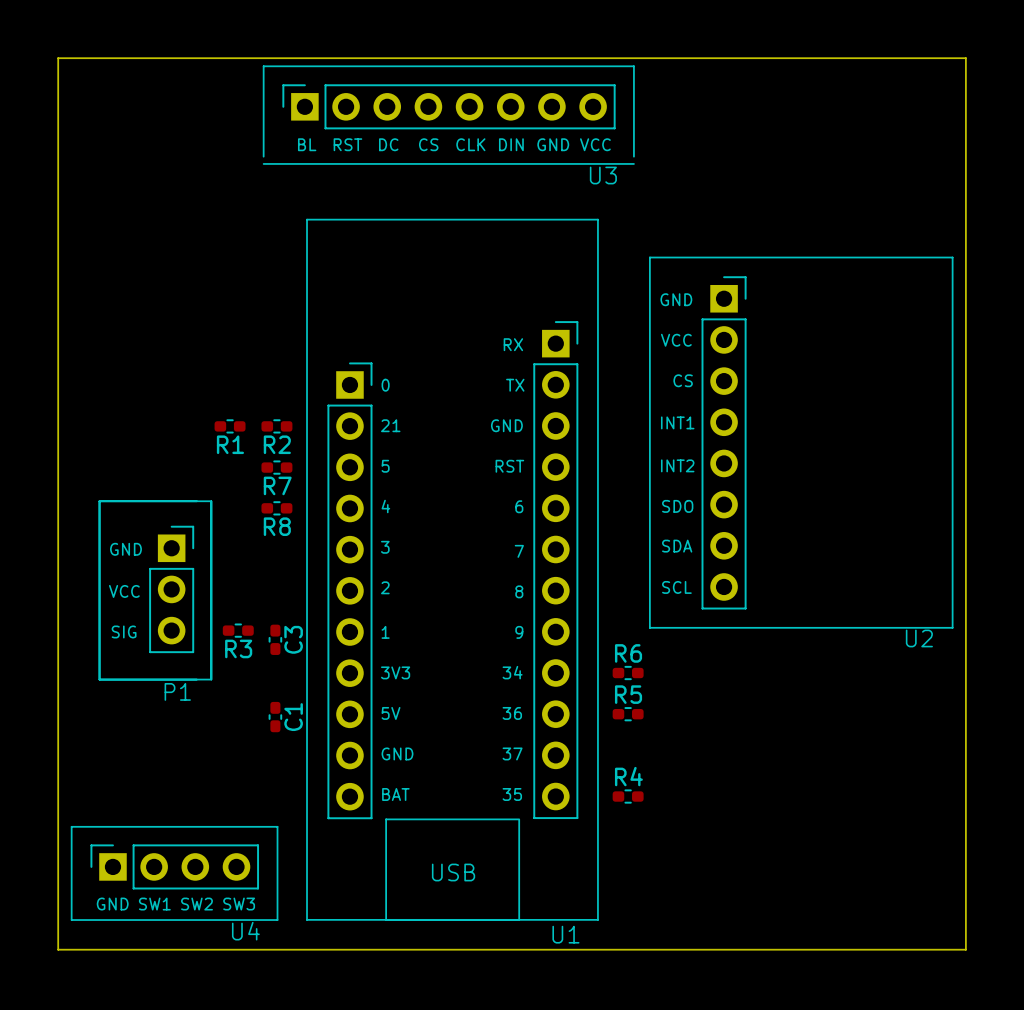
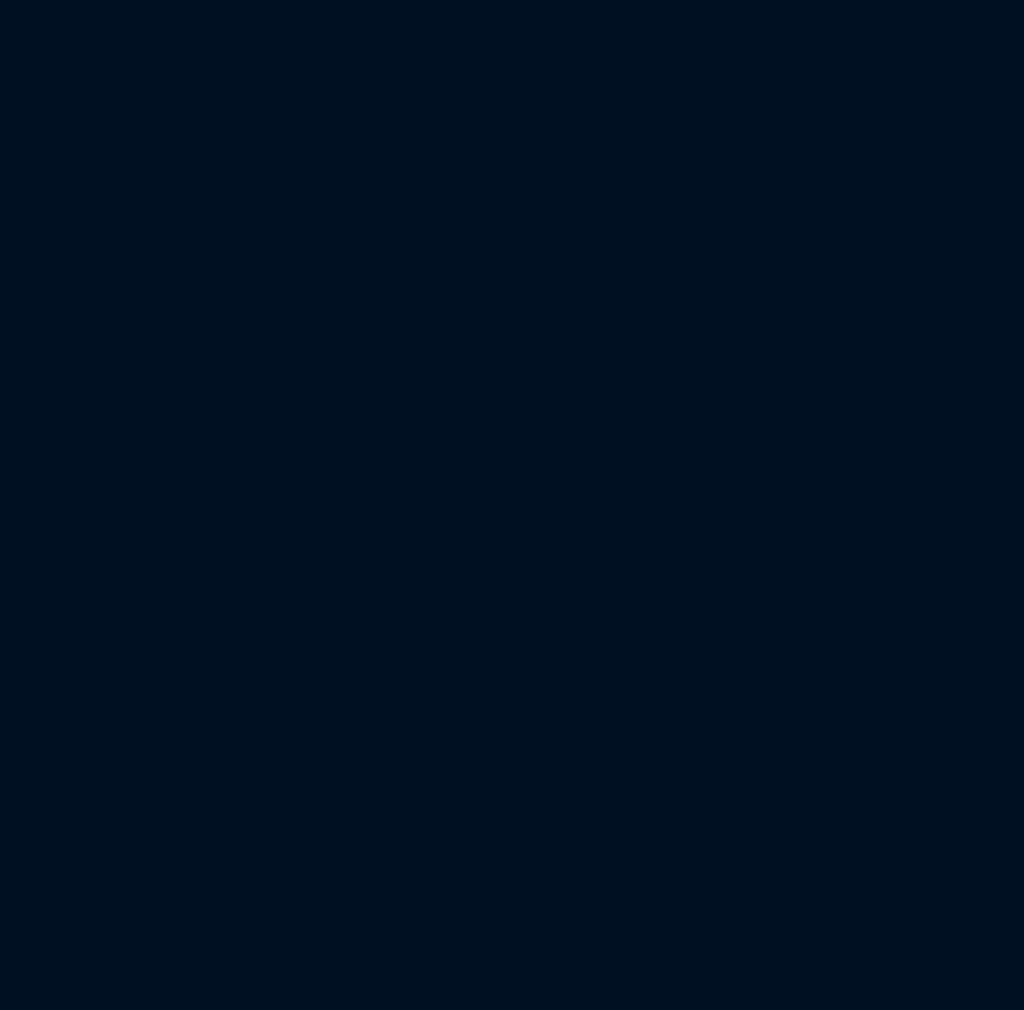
board edge: (58, 58) (965, 58) (965, 949) (58, 949) (58, 58) -> none
U3: (448, 115) -> none
R1: (230, 426) -> none
R2: (276, 426) -> none
U2: (801, 442) -> none
R7: (276, 467) -> none
R8: (276, 508) -> none
U1: (452, 569) -> none
P1: (155, 590) -> none
R3: (238, 630) -> none
C3: (275, 639) -> none
R6: (628, 673) -> none
R5: (628, 714) -> none
C1: (275, 717) -> none
R4: (628, 796) -> none
U4: (174, 873) -> none

